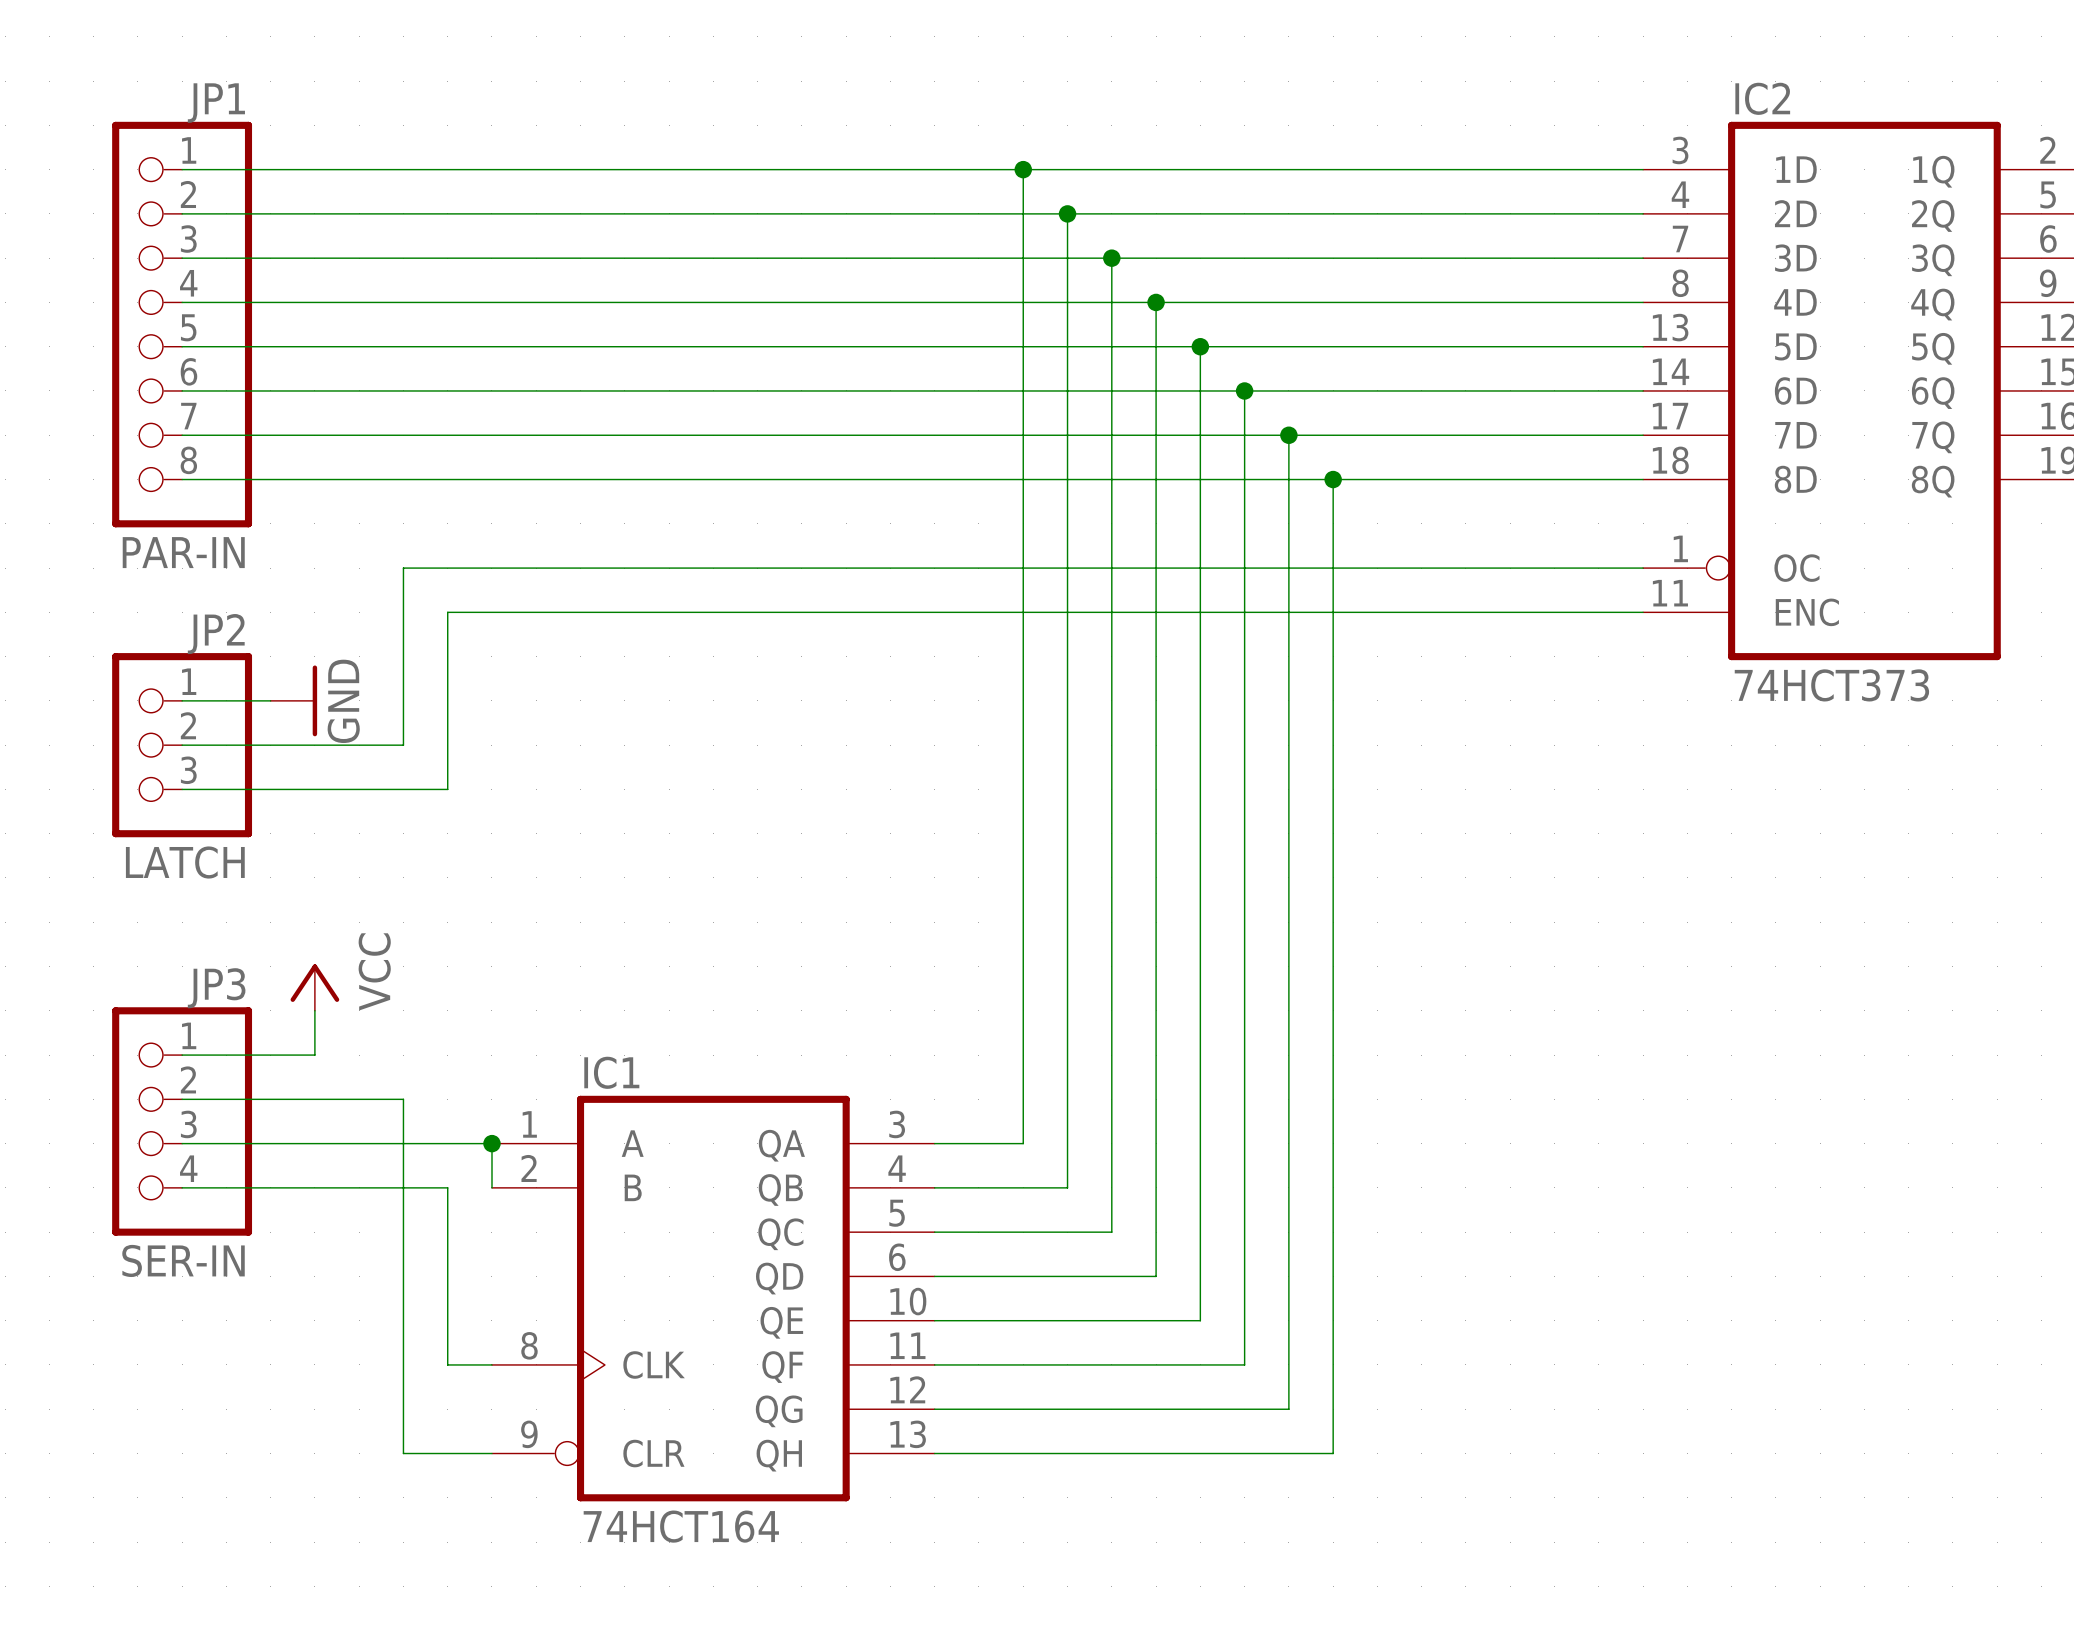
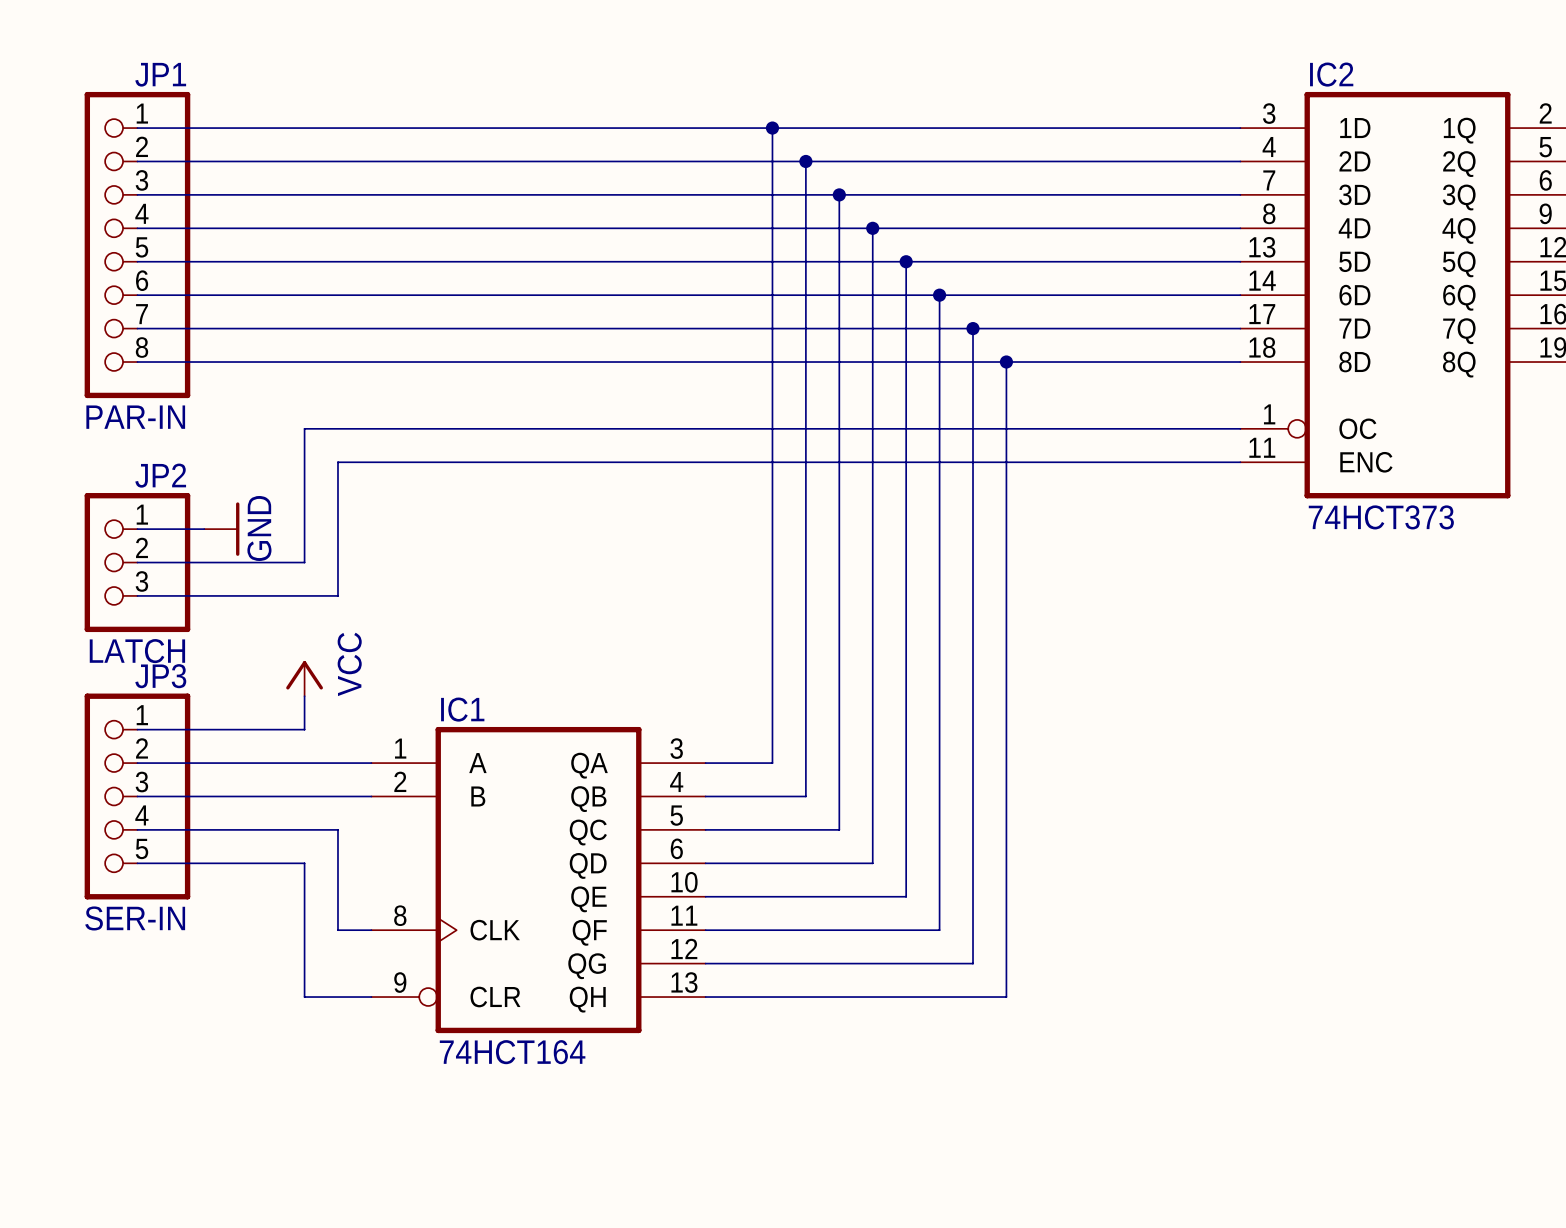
wire: none -> (304, 696) (304, 729) (137, 729)
power symbol position: VCC (314, 987) -> VCC (304, 678)
JP3 symbol: [112, 1007, 253, 1236] -> [84, 693, 191, 900]
wire: none -> (137, 763) (371, 763)
wire: (314, 1010) (314, 1055) -> (371, 796) (237, 796)
wire: (1023, 1010) (1023, 1143) -> (772, 763) (705, 763)
wire: (1067, 1055) (1067, 1187) -> (805, 796) (705, 796)
wire: (403, 1099) (403, 1143) (491, 1143) (491, 1187) -> (304, 829) (337, 829) (337, 896)
wire: none -> (705, 829) (839, 829)
wire: (1111, 1099) (1111, 1232) -> (939, 930) (839, 930)
junction: (491, 1143) -> none
wire: none -> (772, 863) (872, 863)
wire: (1156, 1143) (1156, 1276) -> (973, 963) (872, 963)
wire: (182, 1187) (447, 1187) -> none
wire: (1200, 1187) (1200, 1320) -> (906, 896) (805, 896)
wire: (447, 1232) (447, 1364) (491, 1364) -> (337, 930) (371, 930)
wire: (1244, 1232) (1244, 1364) (934, 1364) -> none
wire: (1288, 1276) (1288, 1409) (934, 1409) -> none
IC1 position: (713, 1298) -> (538, 880)
wire: (403, 1320) (403, 1453) (491, 1453) -> (304, 997) (371, 997)
wire: (1333, 1320) (1333, 1453) (934, 1453) -> (1006, 997) (906, 997)

